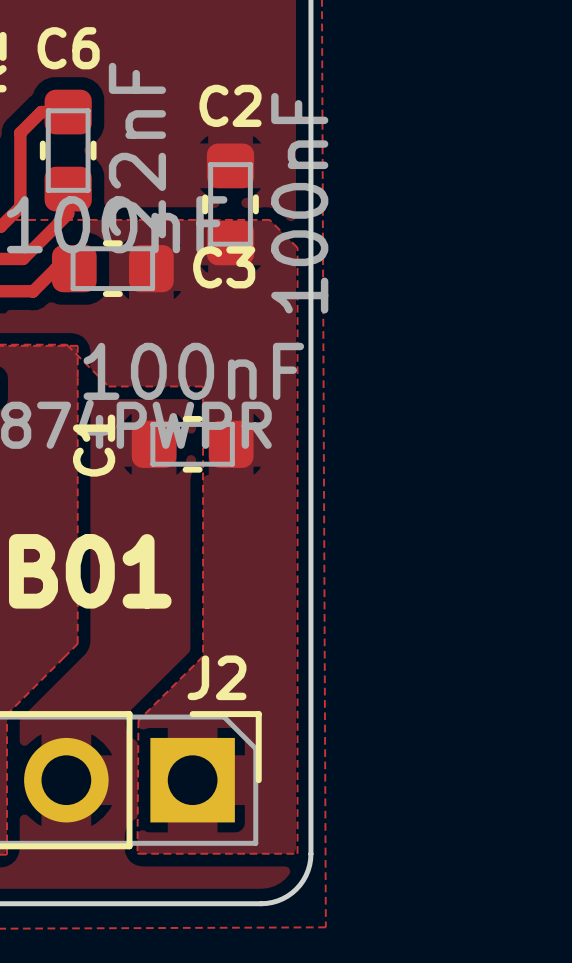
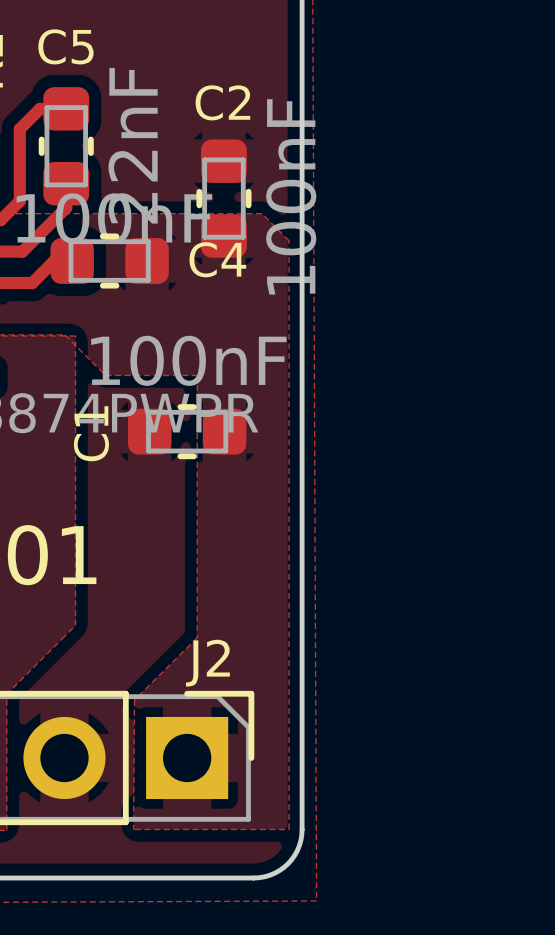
C6 name: C6 (68, 48) -> C5 (65, 46)
C3 name: C3 (224, 267) -> C4 (217, 259)

